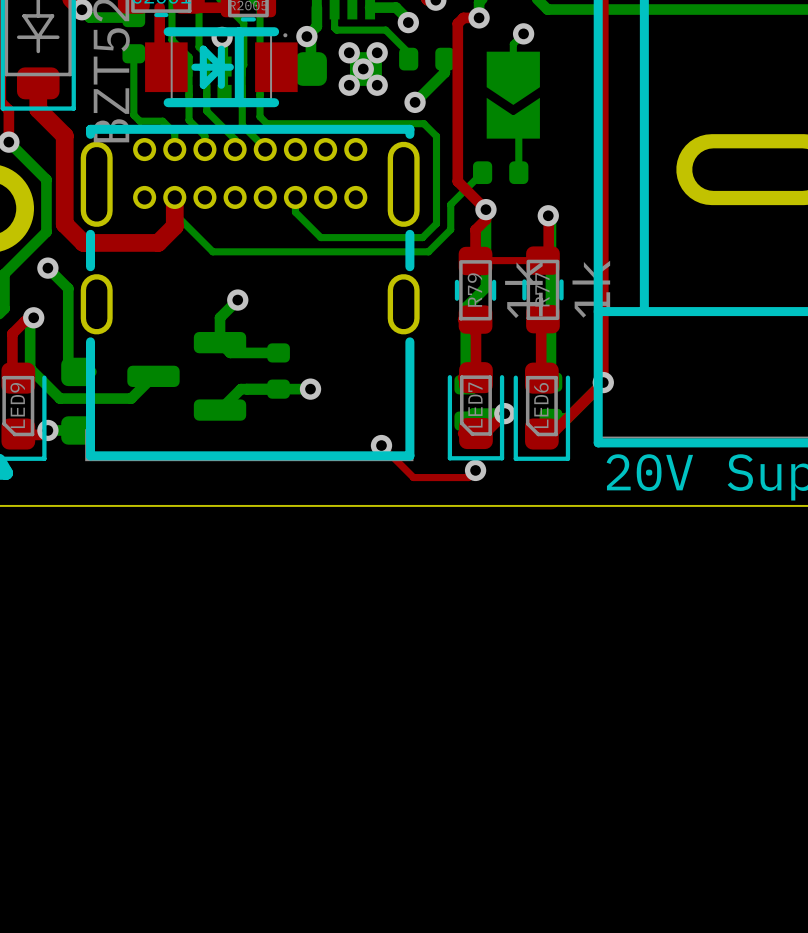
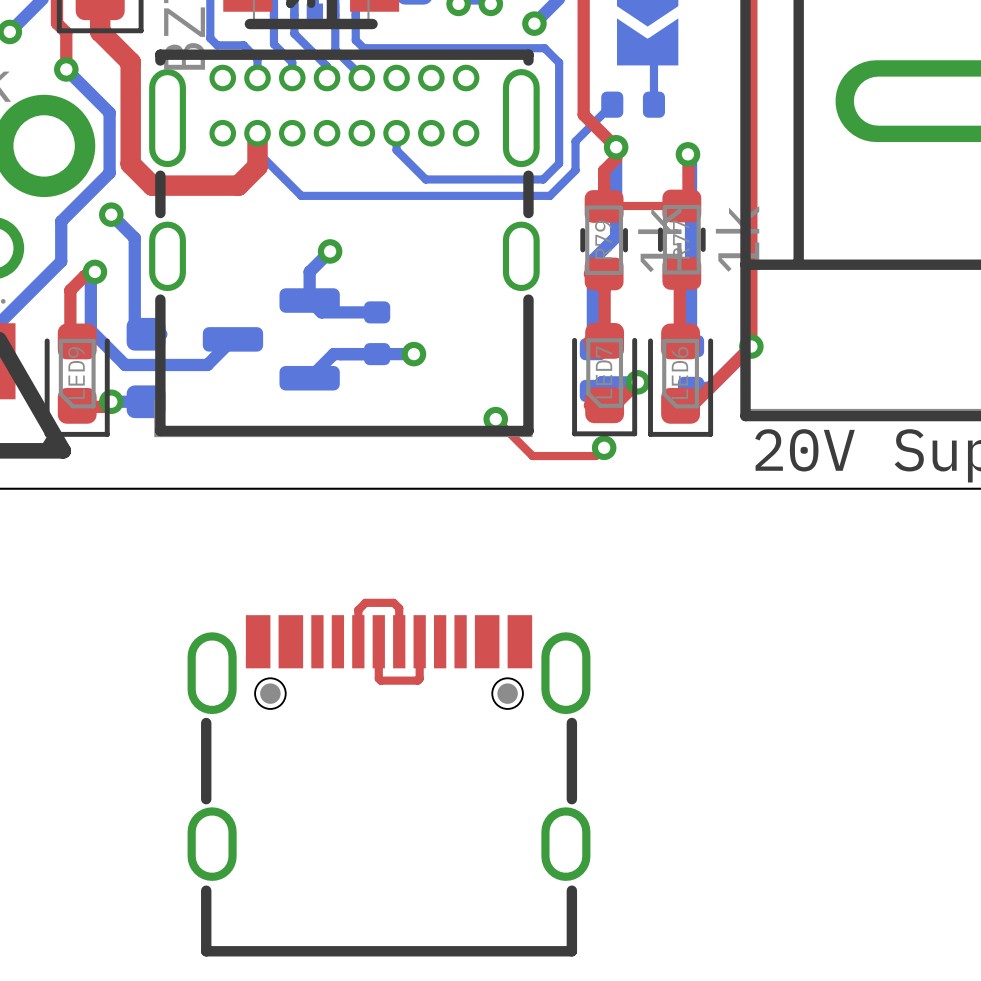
top track: none -> (358, 641) (358, 610) (365, 602) (393, 602) (399, 608) (399, 641)
top track: none -> (378, 641) (378, 678) (380, 680) (417, 680) (419, 678) (419, 641)
part: none -> (389, 785)

